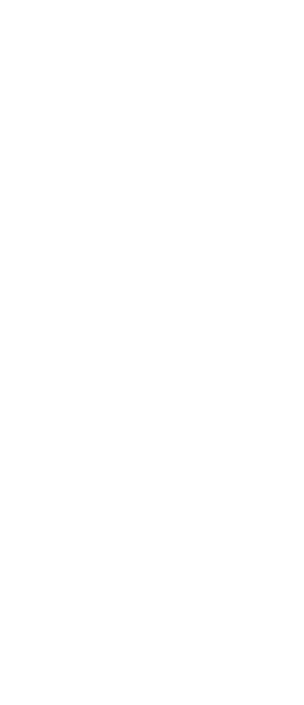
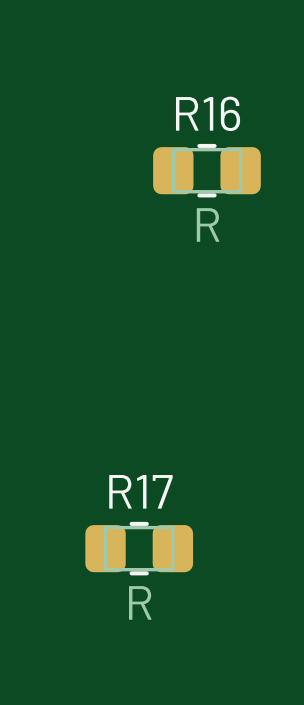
R16: none -> R (206, 170)
R17: none -> R (139, 548)

